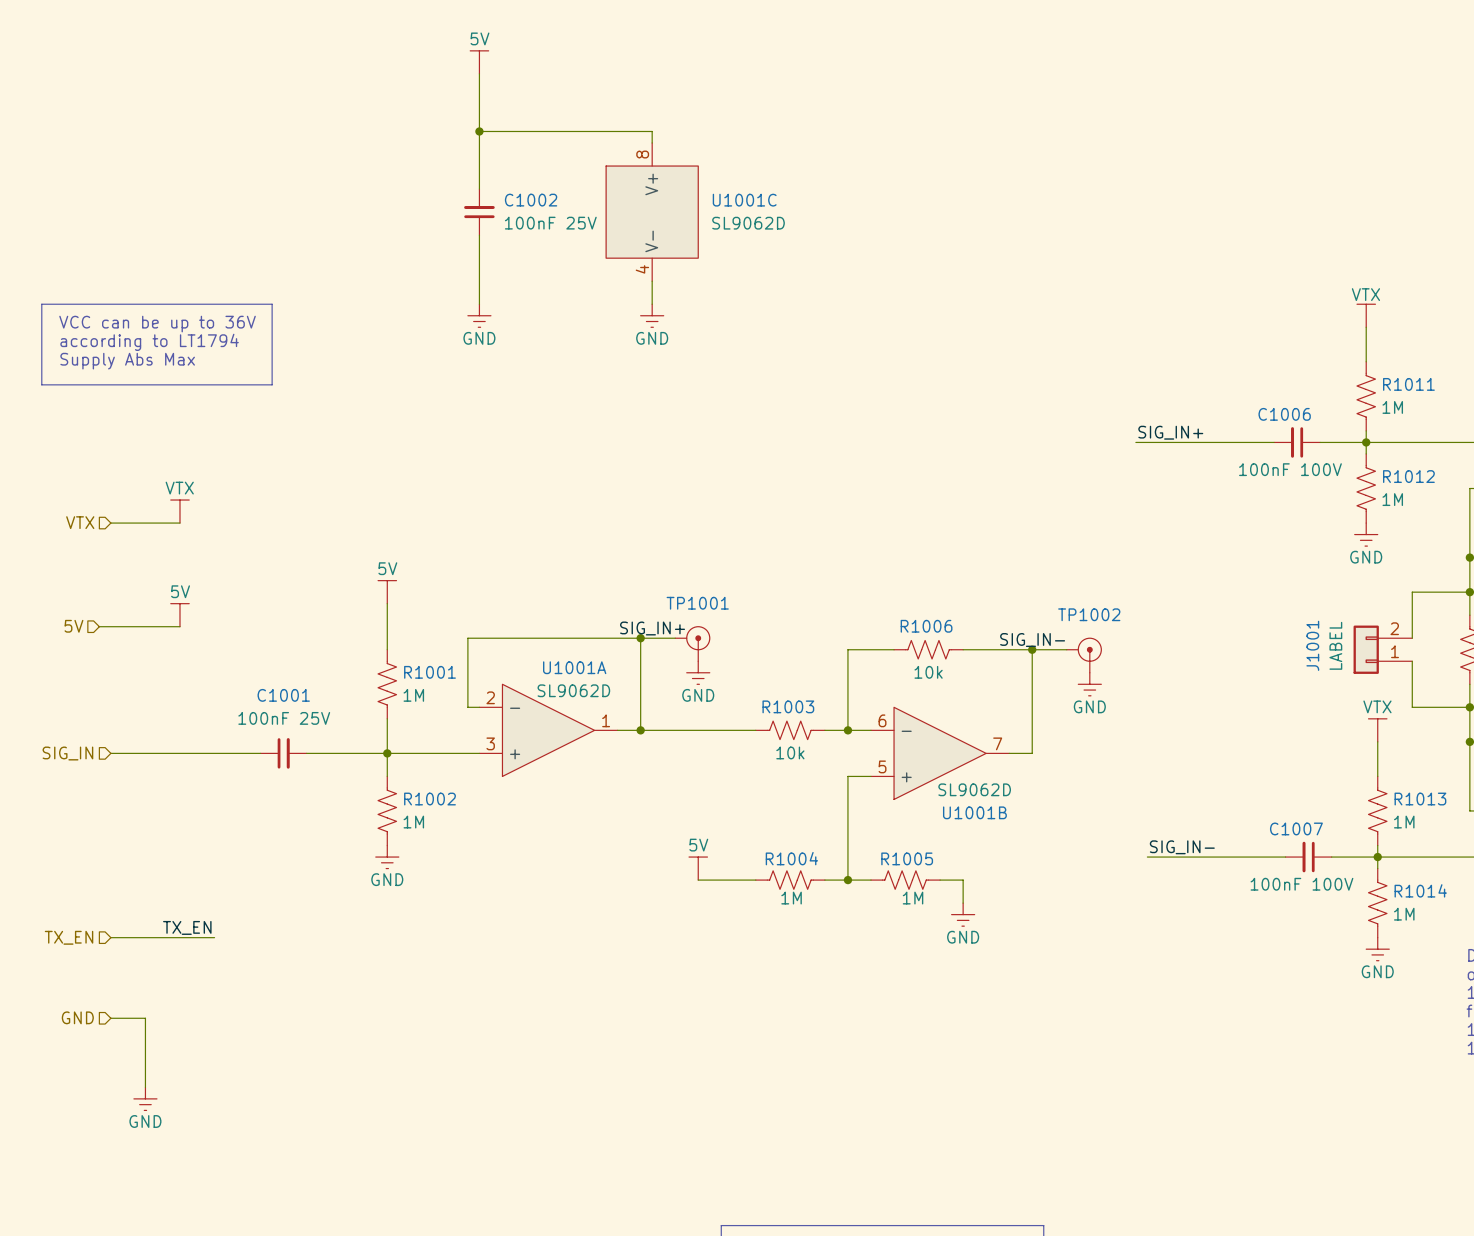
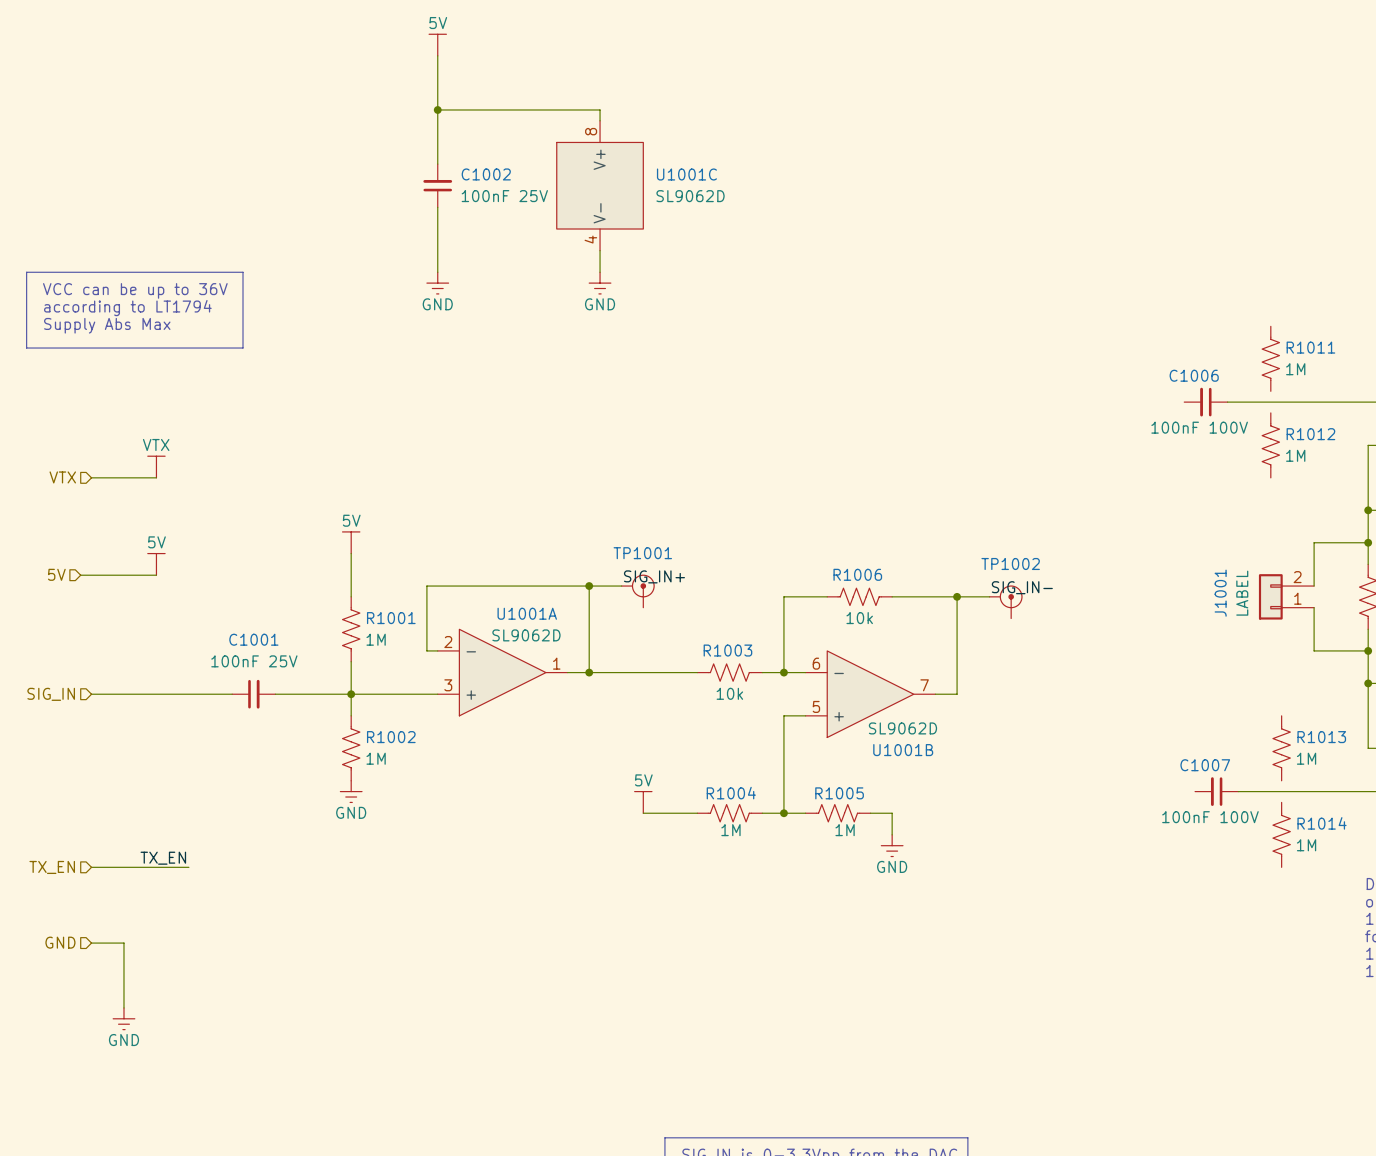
power symbol: VTX (1366, 315) -> none
wire: (1366, 327) (1366, 361) -> none
wire: (1366, 430) (1366, 453) -> none
label: SIG_IN+ (1170, 432) -> none
wire: (1135, 442) (1274, 442) -> none
junction: (1366, 442) -> none
power symbol: GND (1366, 534) -> none
label position: SIG_IN+ (652, 628) -> SIG_IN+ (654, 576)
label position: SIG_IN- (1032, 640) -> SIG_IN- (1022, 587)
power symbol: GND (698, 672) -> none
power symbol: GND (1089, 684) -> none
power symbol: VTX (1377, 730) -> none
wire: (1377, 741) (1377, 776) -> none
wire: (1377, 845) (1377, 868) -> none
label: SIG_IN- (1182, 847) -> none
wire: (1147, 857) (1285, 857) -> none
junction: (1377, 857) -> none
power symbol: GND (1377, 949) -> none

